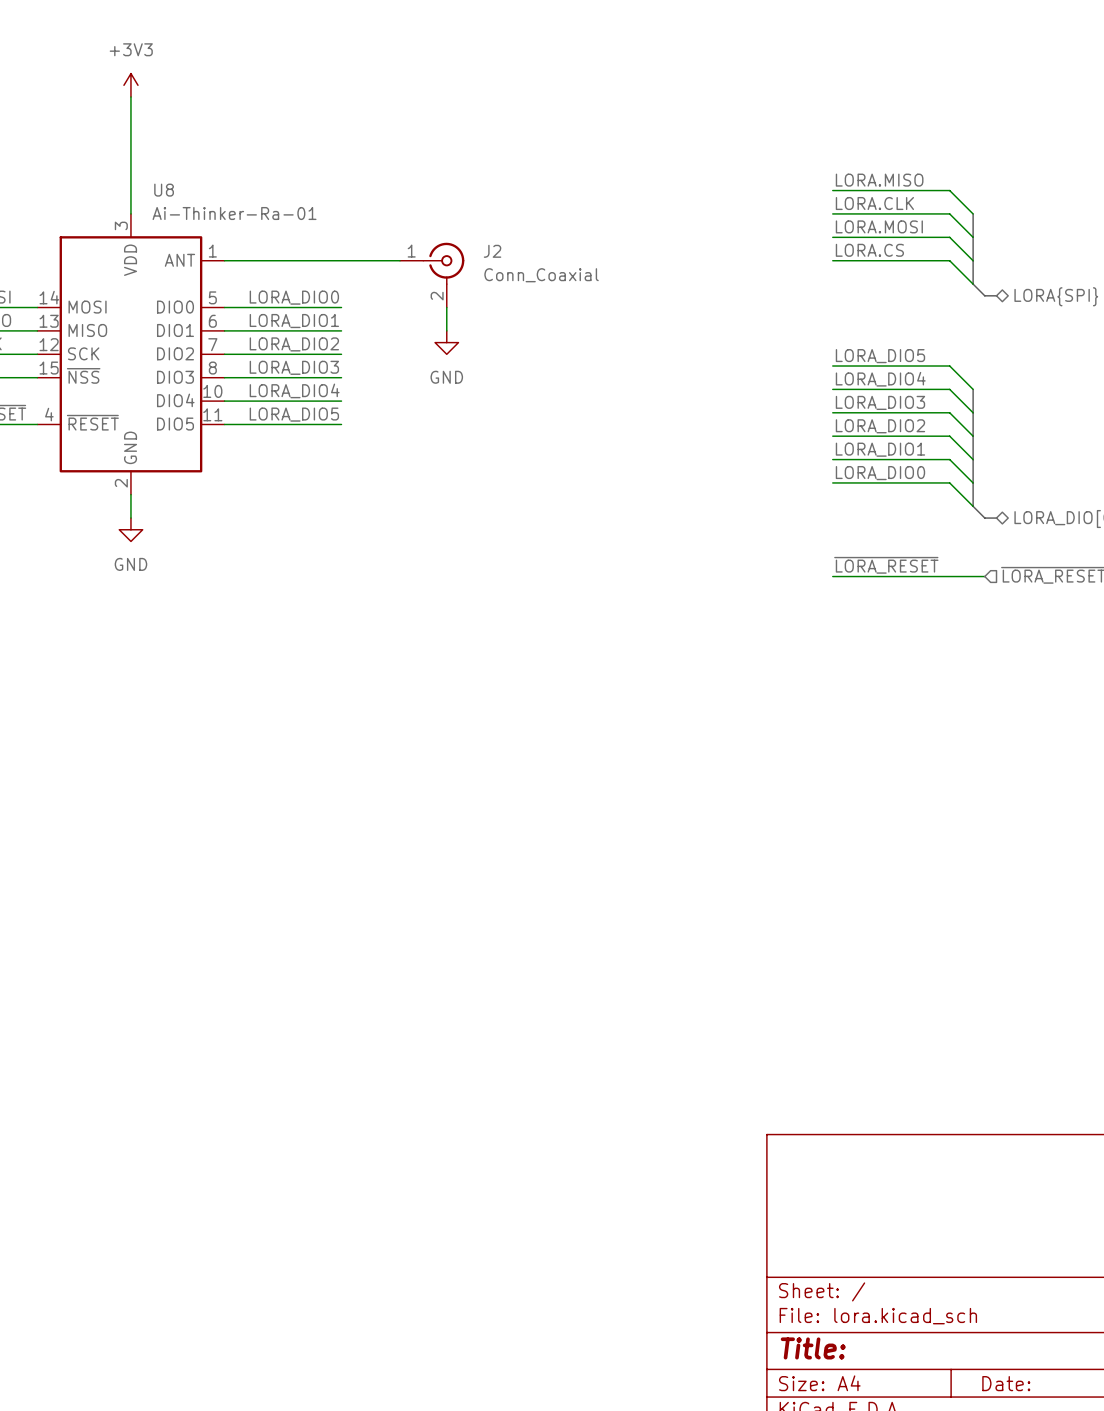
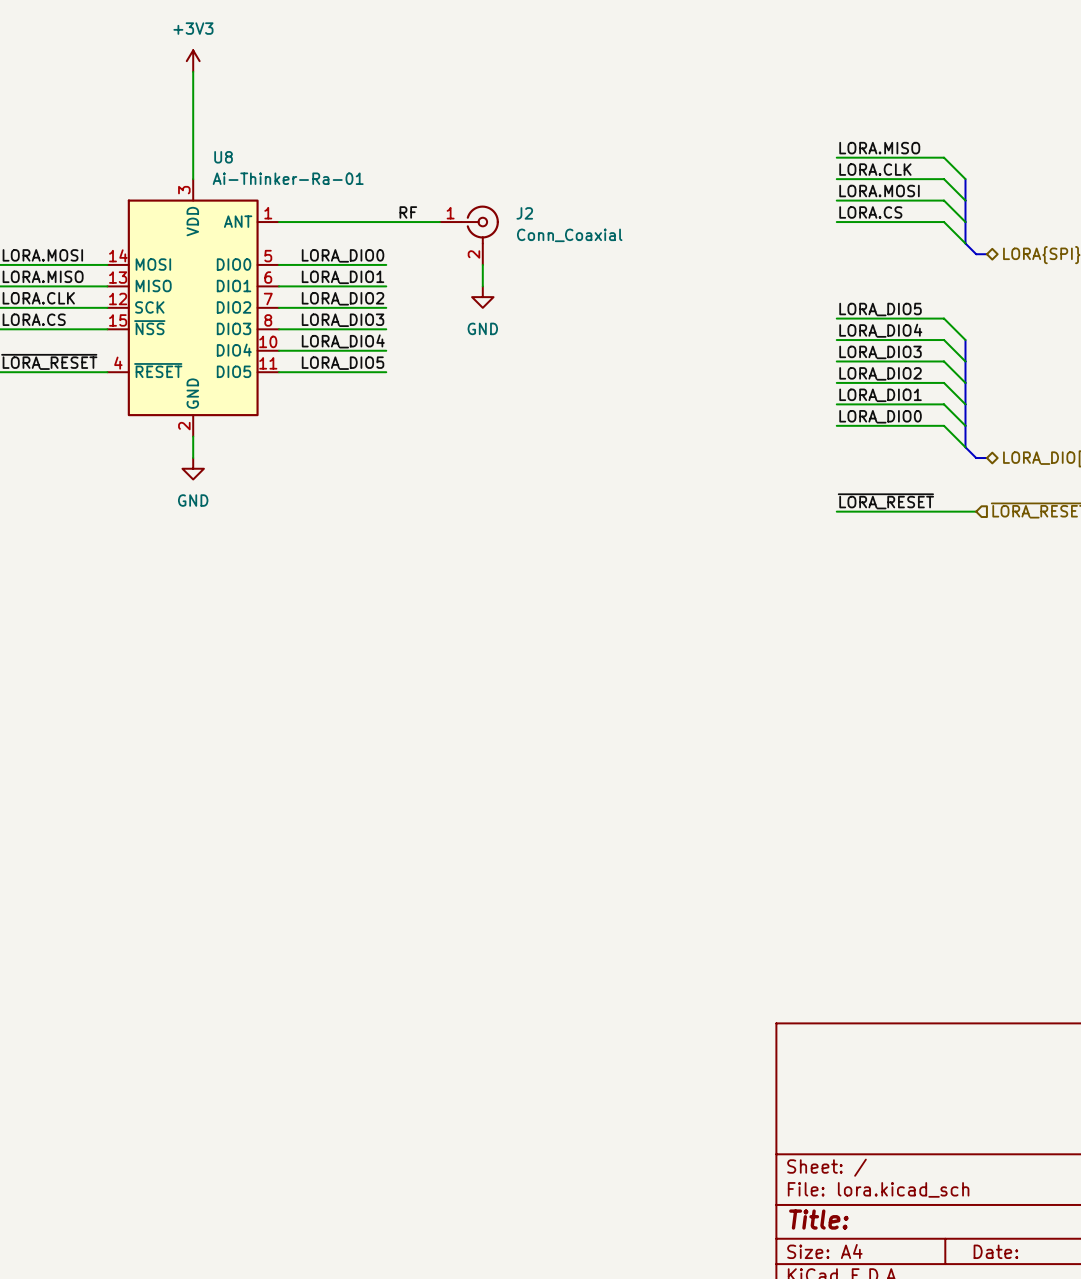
label: none -> RF (408, 212)

